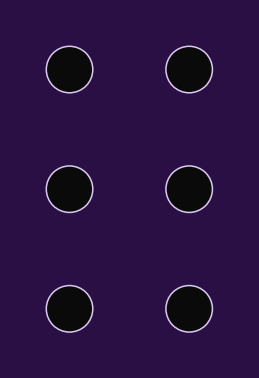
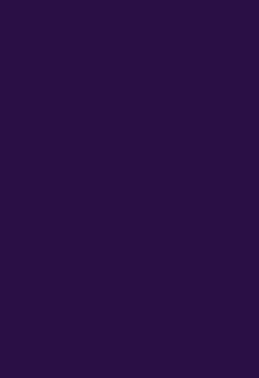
part: (69, 69) -> none
part: (189, 69) -> none
part: (69, 189) -> none
part: (189, 189) -> none
part: (69, 308) -> none
part: (189, 308) -> none

